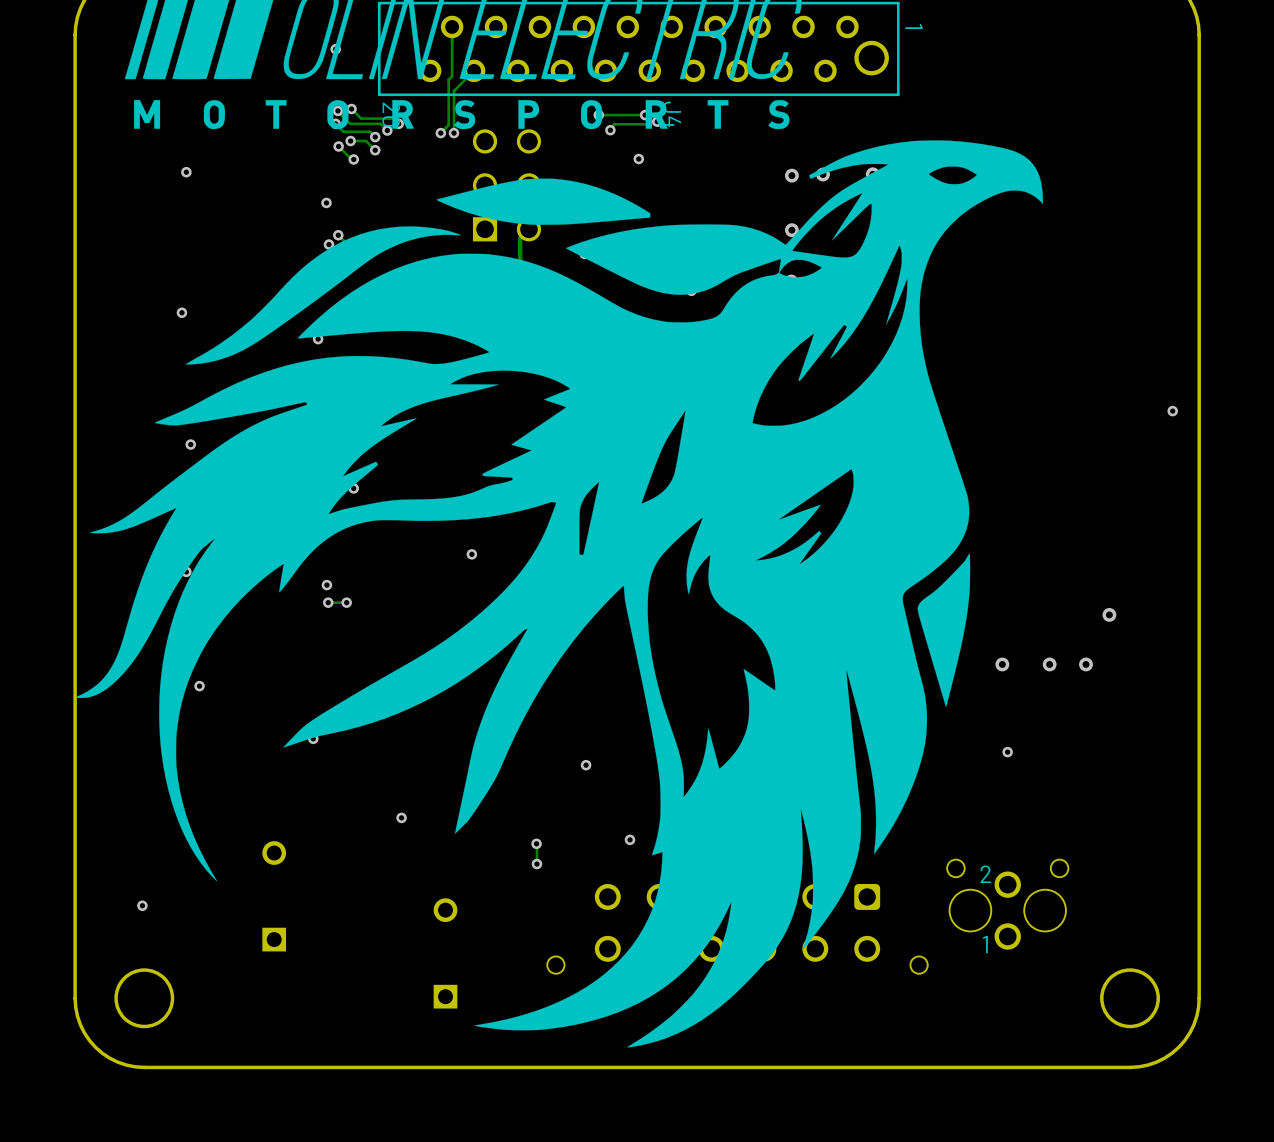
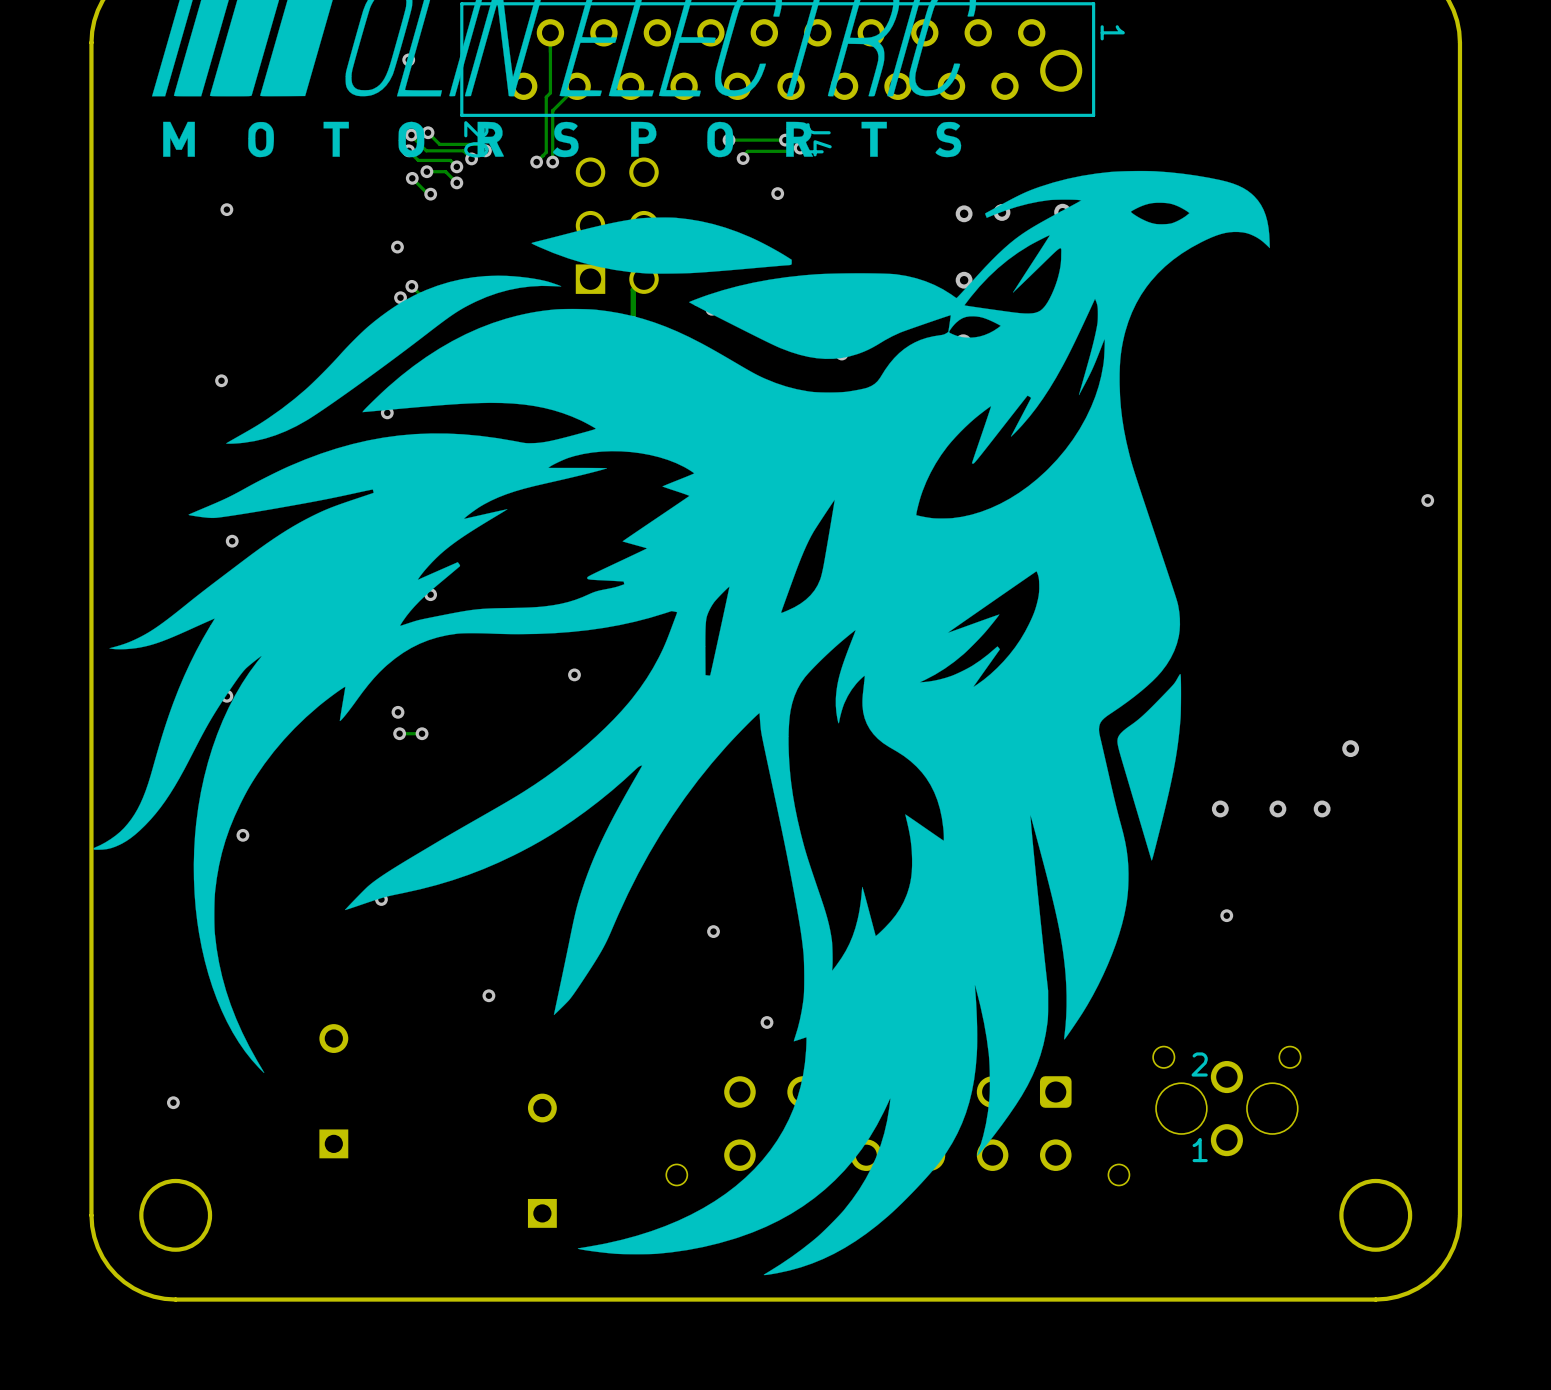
track: (536, 843) (536, 864) -> none
via: (536, 843) -> none
via: (536, 864) -> none

